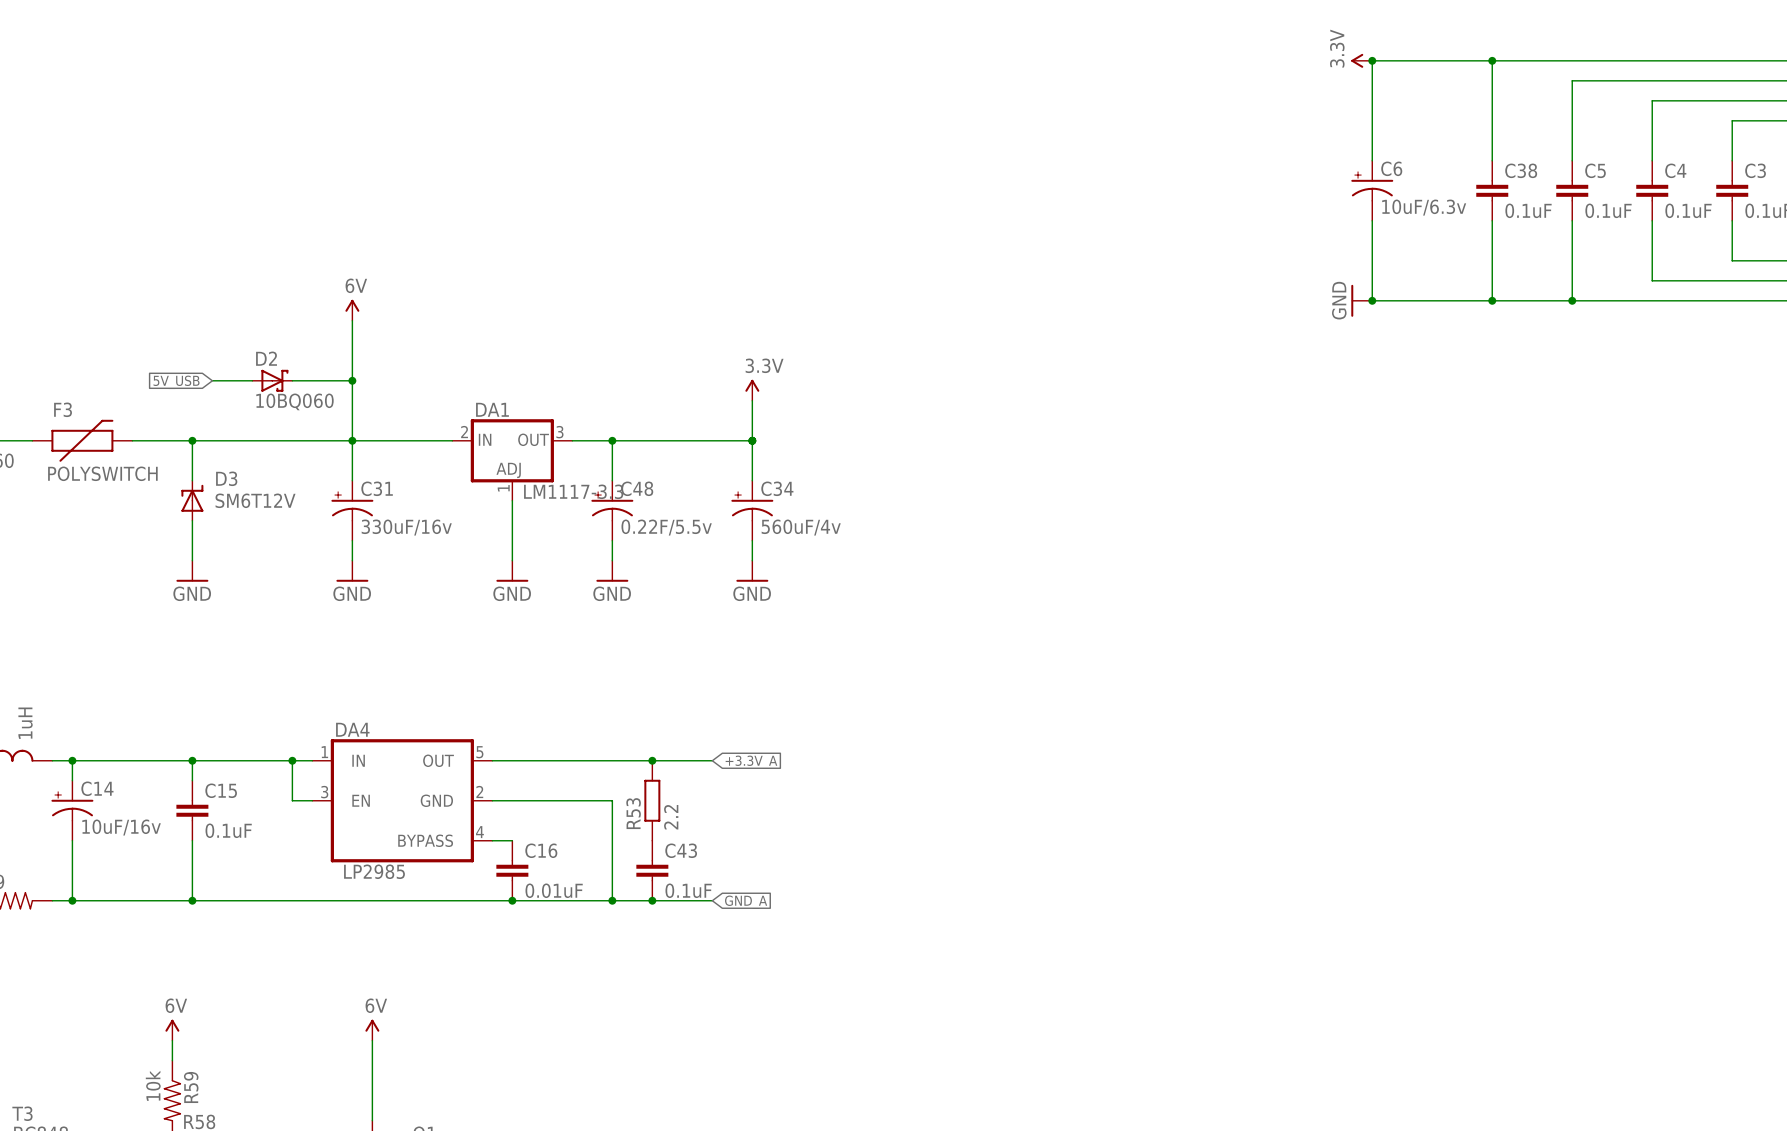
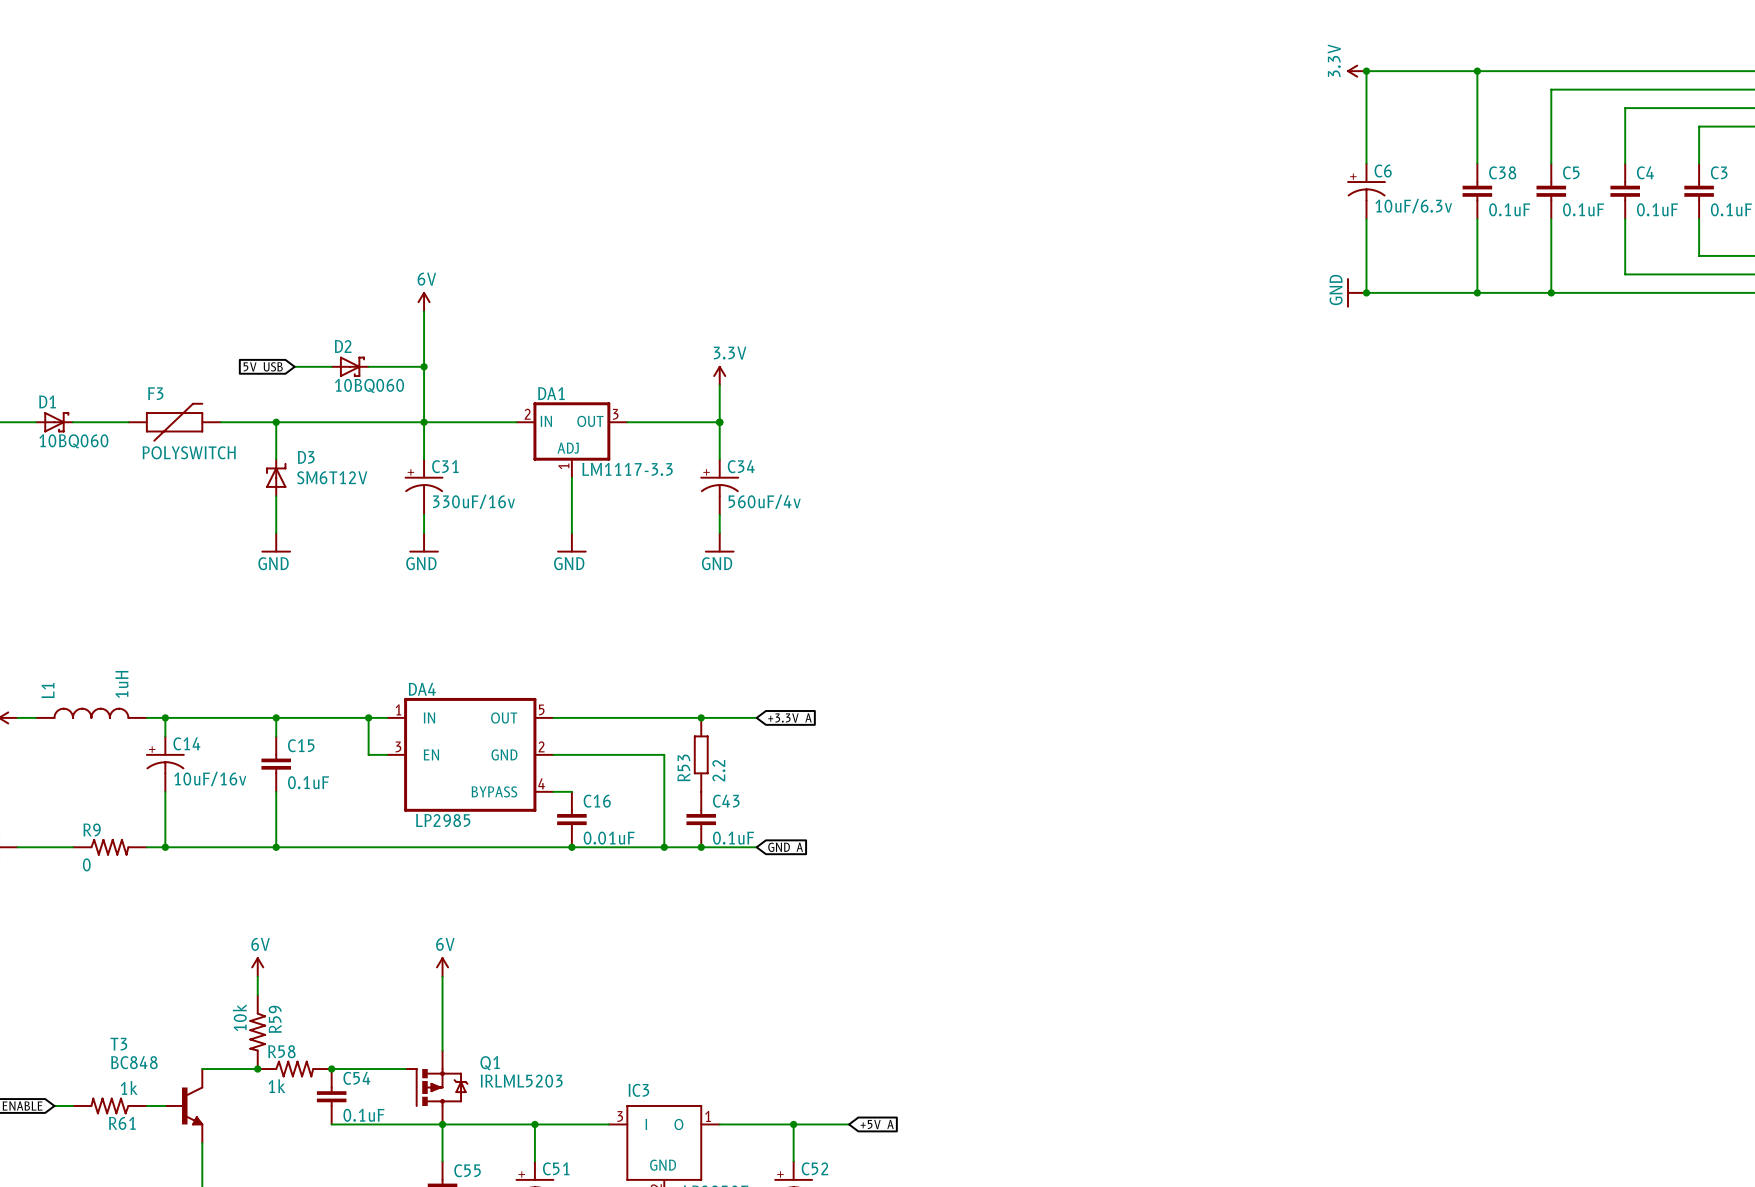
power symbol position: 3.3V (752, 390) -> 3.3V (719, 375)
wire: (752, 400) (752, 480) -> (719, 385) (719, 459)
wire: (612, 440) (612, 480) -> none
junction: (612, 440) -> none
wire: (672, 440) (752, 440) -> none
junction: none -> (719, 422)
junction: (752, 440) -> none
C48: 0.22F/5.5v (612, 510) -> none
C34 position: (752, 510) -> (719, 486)
wire: (612, 540) (612, 560) -> none
wire: (752, 540) (752, 560) -> (719, 514) (719, 533)
power symbol: GND (612, 571) -> none
power symbol: none -> GND (719, 542)
power symbol: GND (752, 571) -> none

